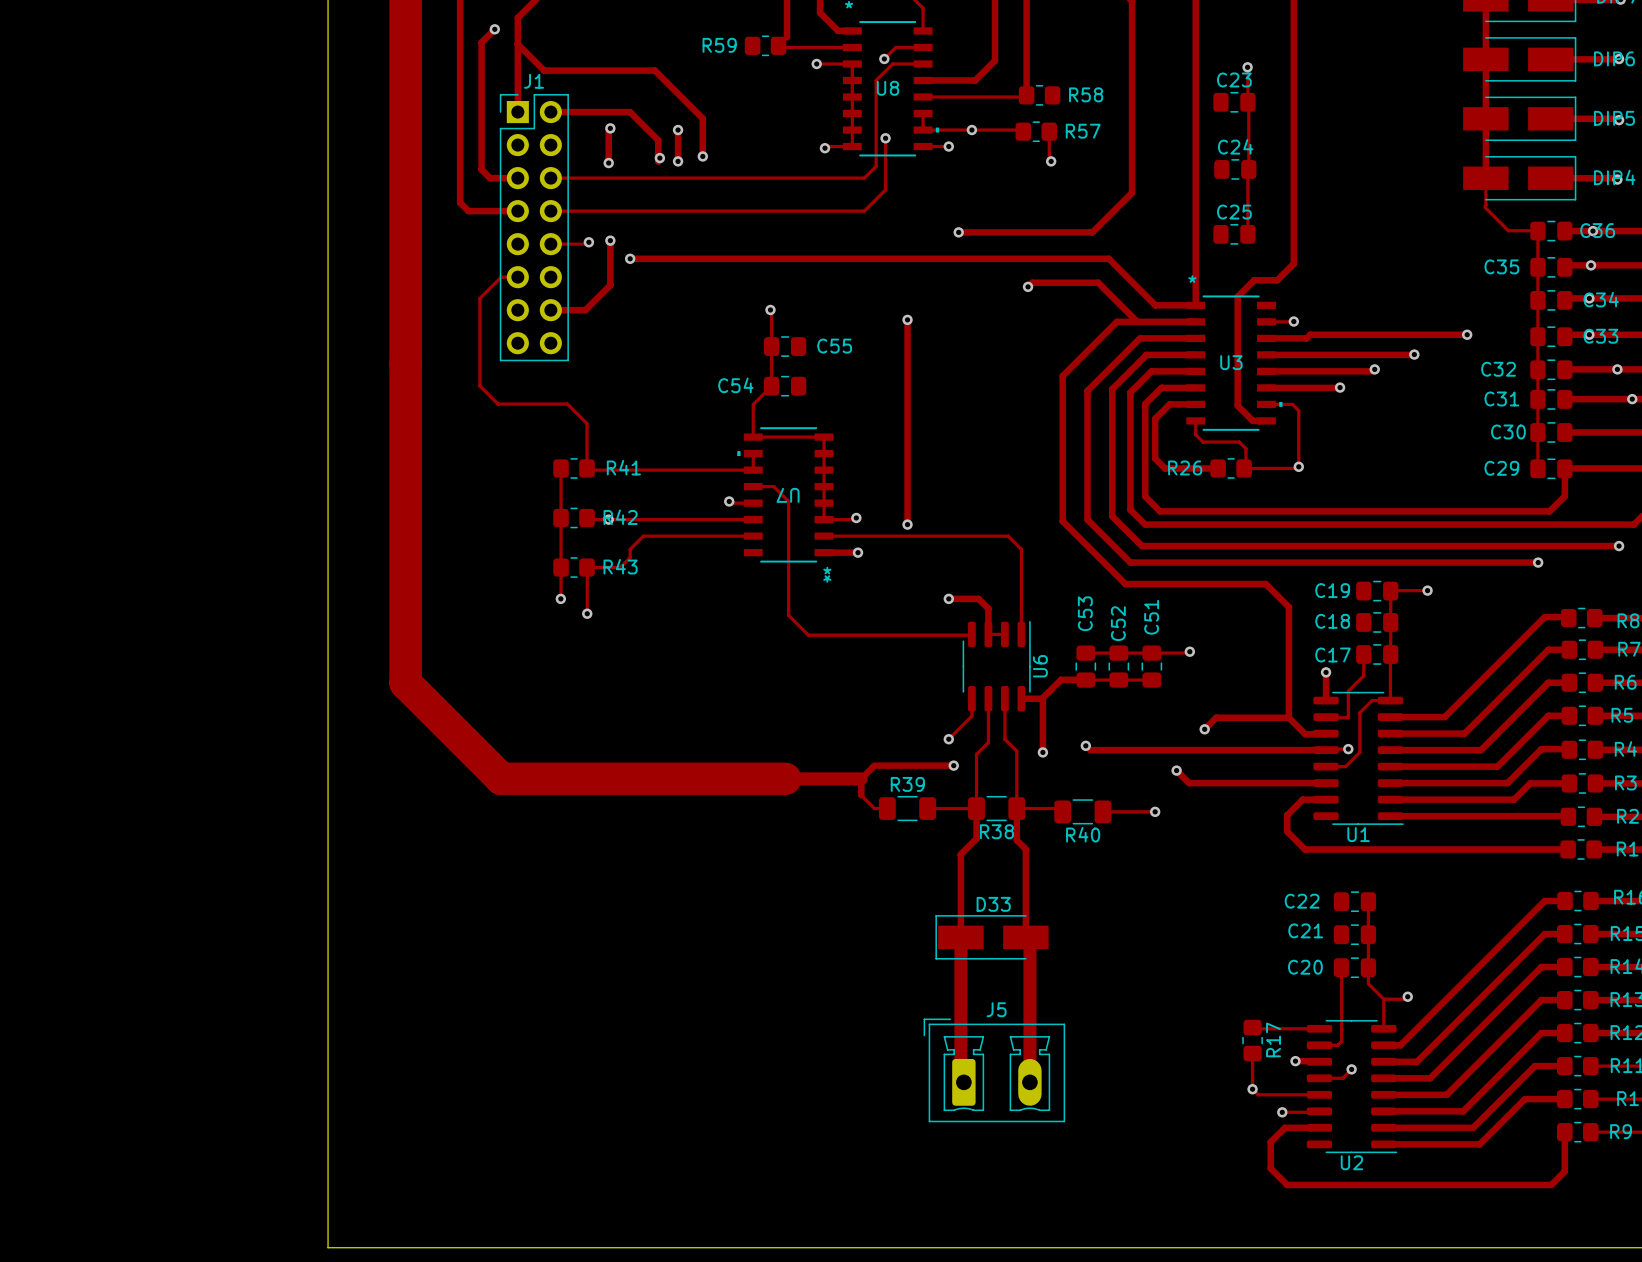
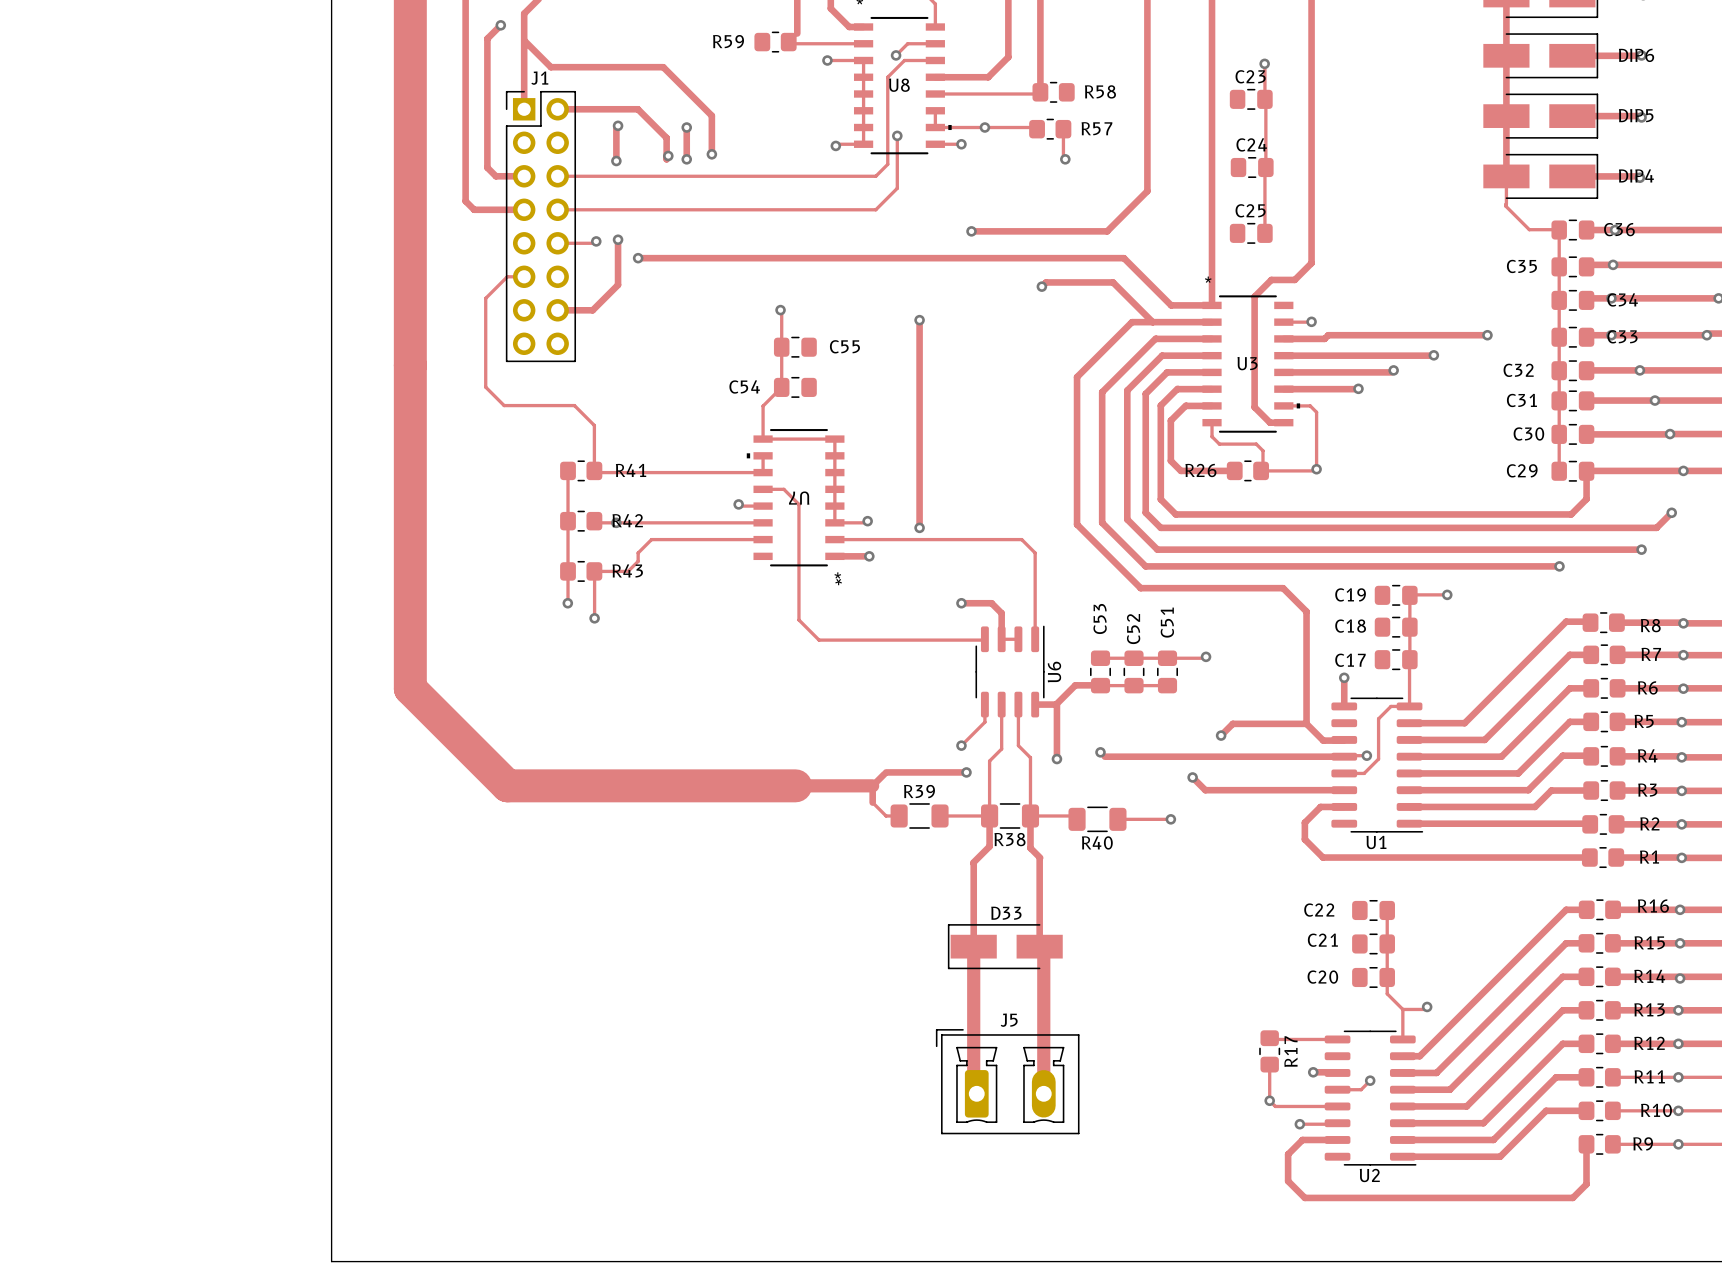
track: (1363, 654) (1363, 675) (1348, 691) (1348, 717) (1326, 717) -> none
track: (1341, 967) (1341, 1041) (1337, 1045) (1319, 1045) -> none

